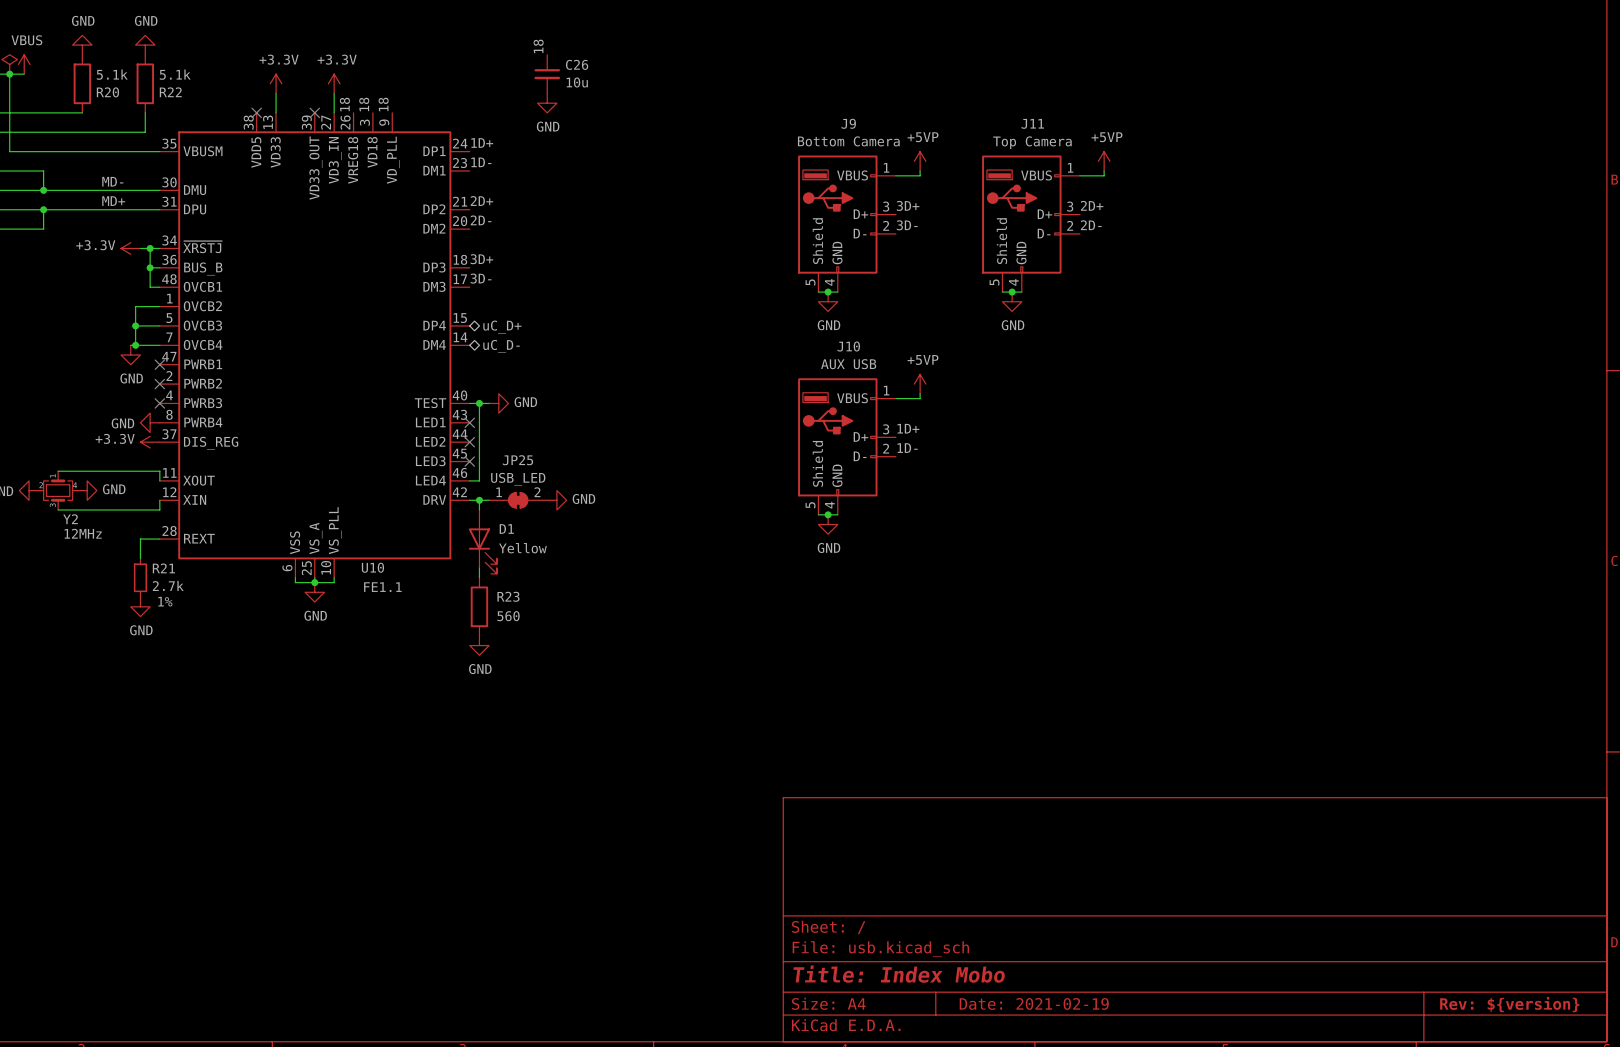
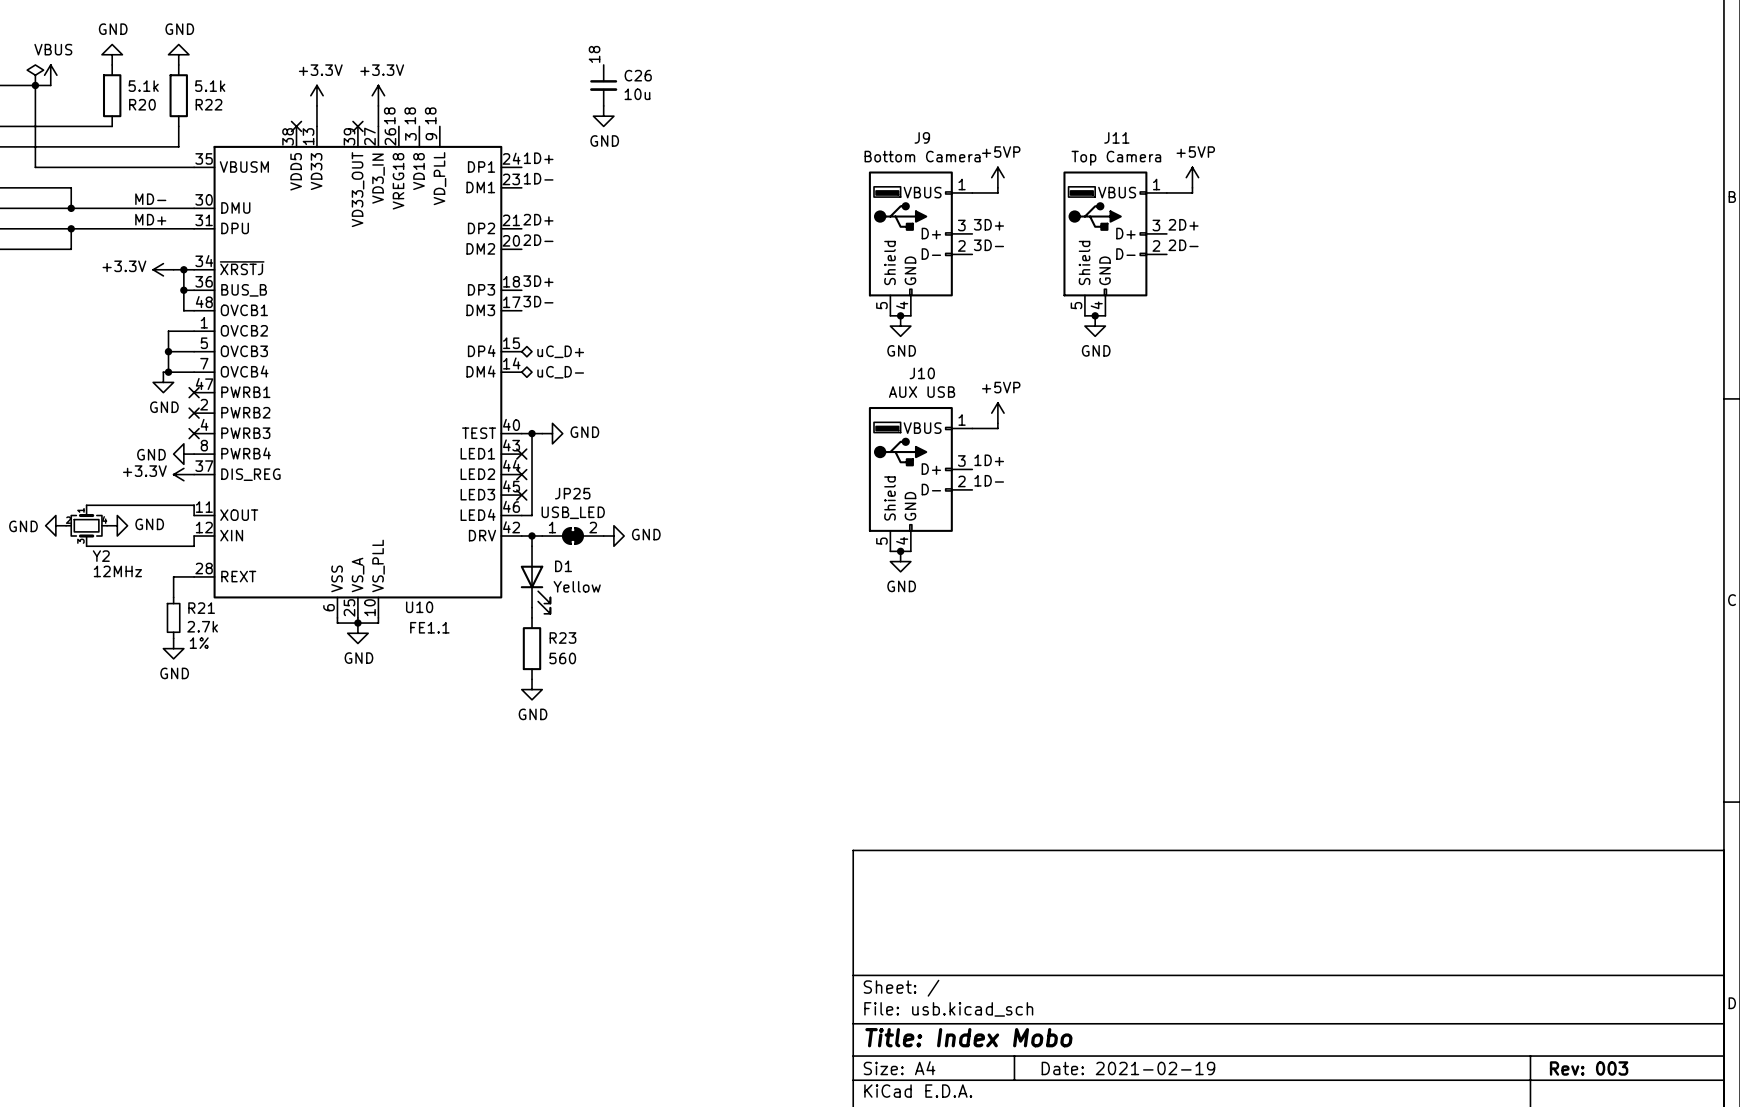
title block: Rev: ${version} (1509, 1004) -> Rev: 003 (1589, 1068)

